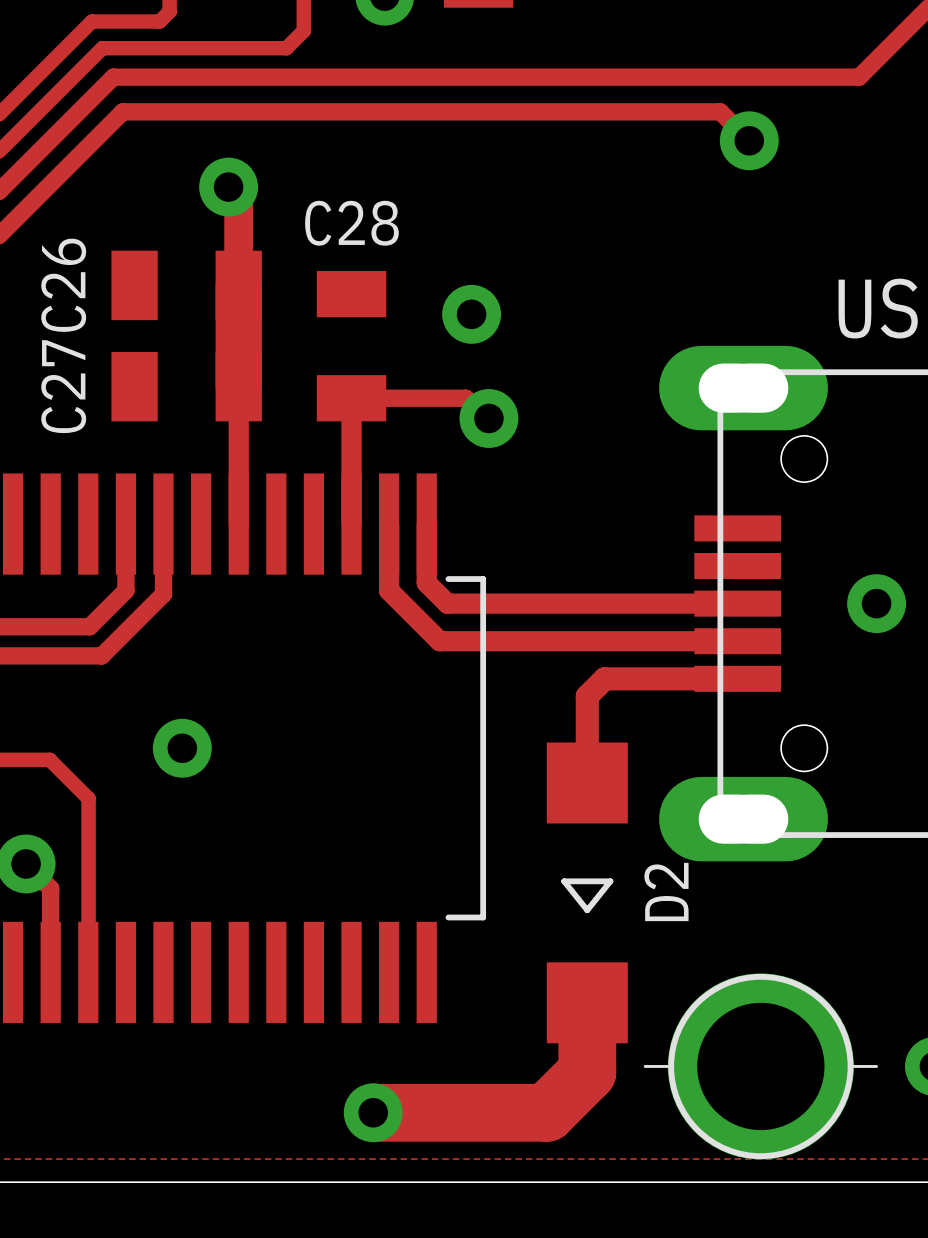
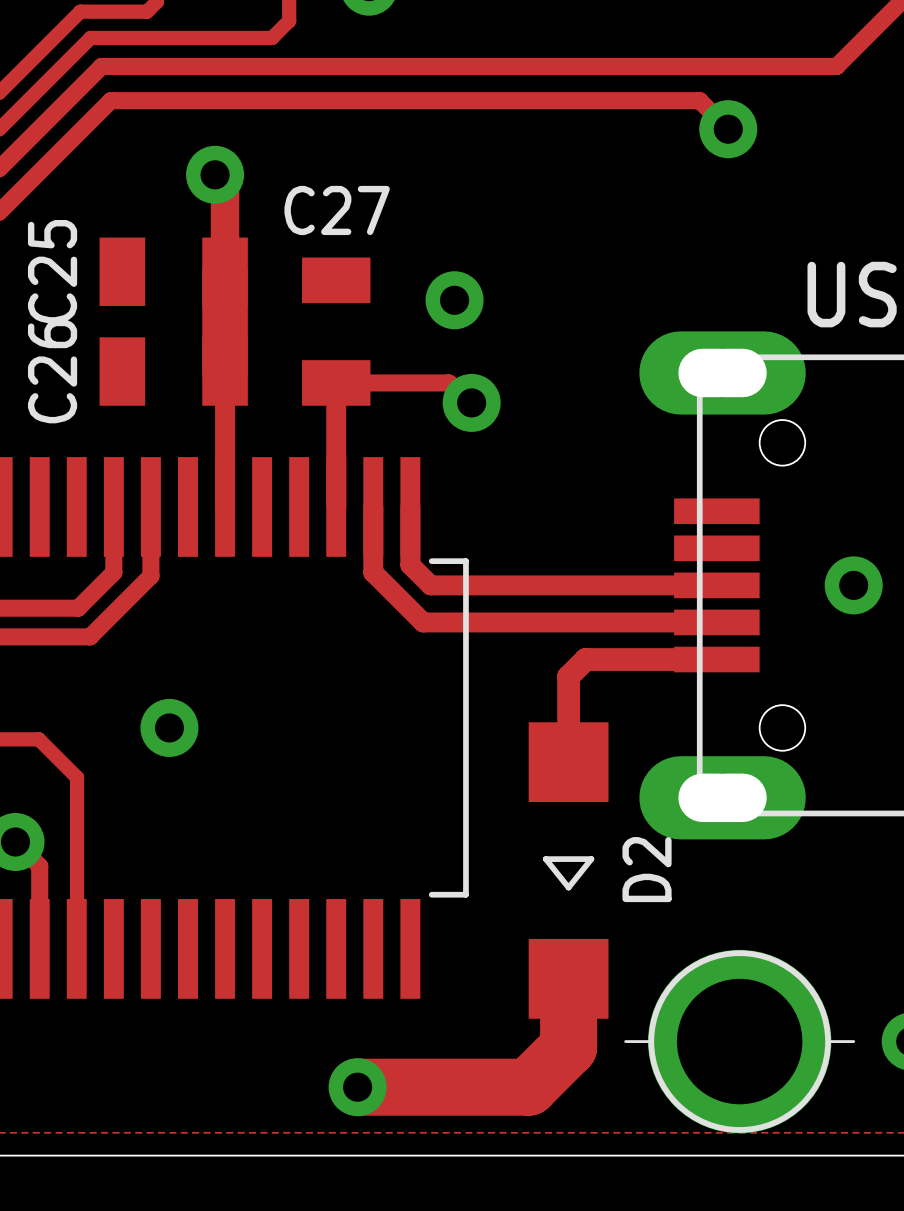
C28 name: C28 (351, 223) -> C27 (337, 210)
C26 name: C26 (63, 285) -> C25 (52, 271)
C27 name: C27 (63, 386) -> C26 (52, 371)

